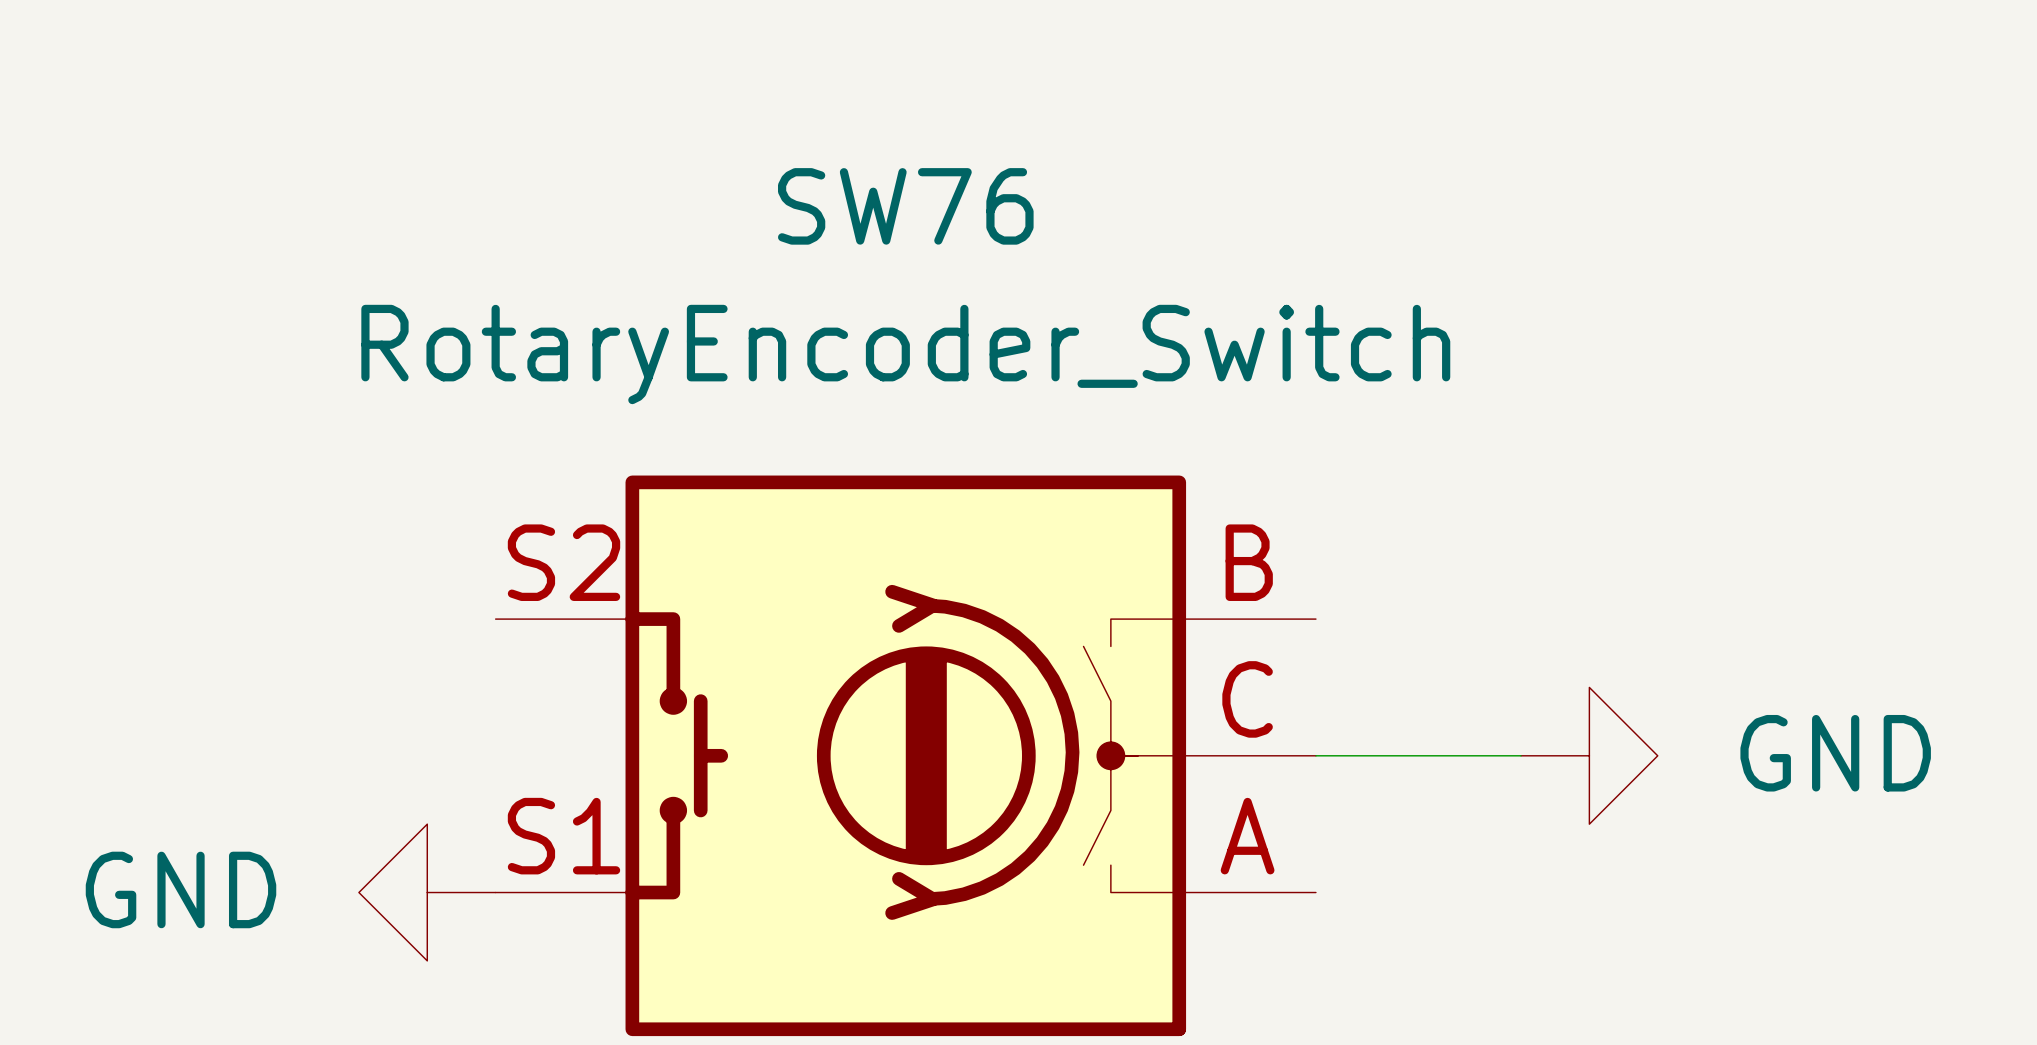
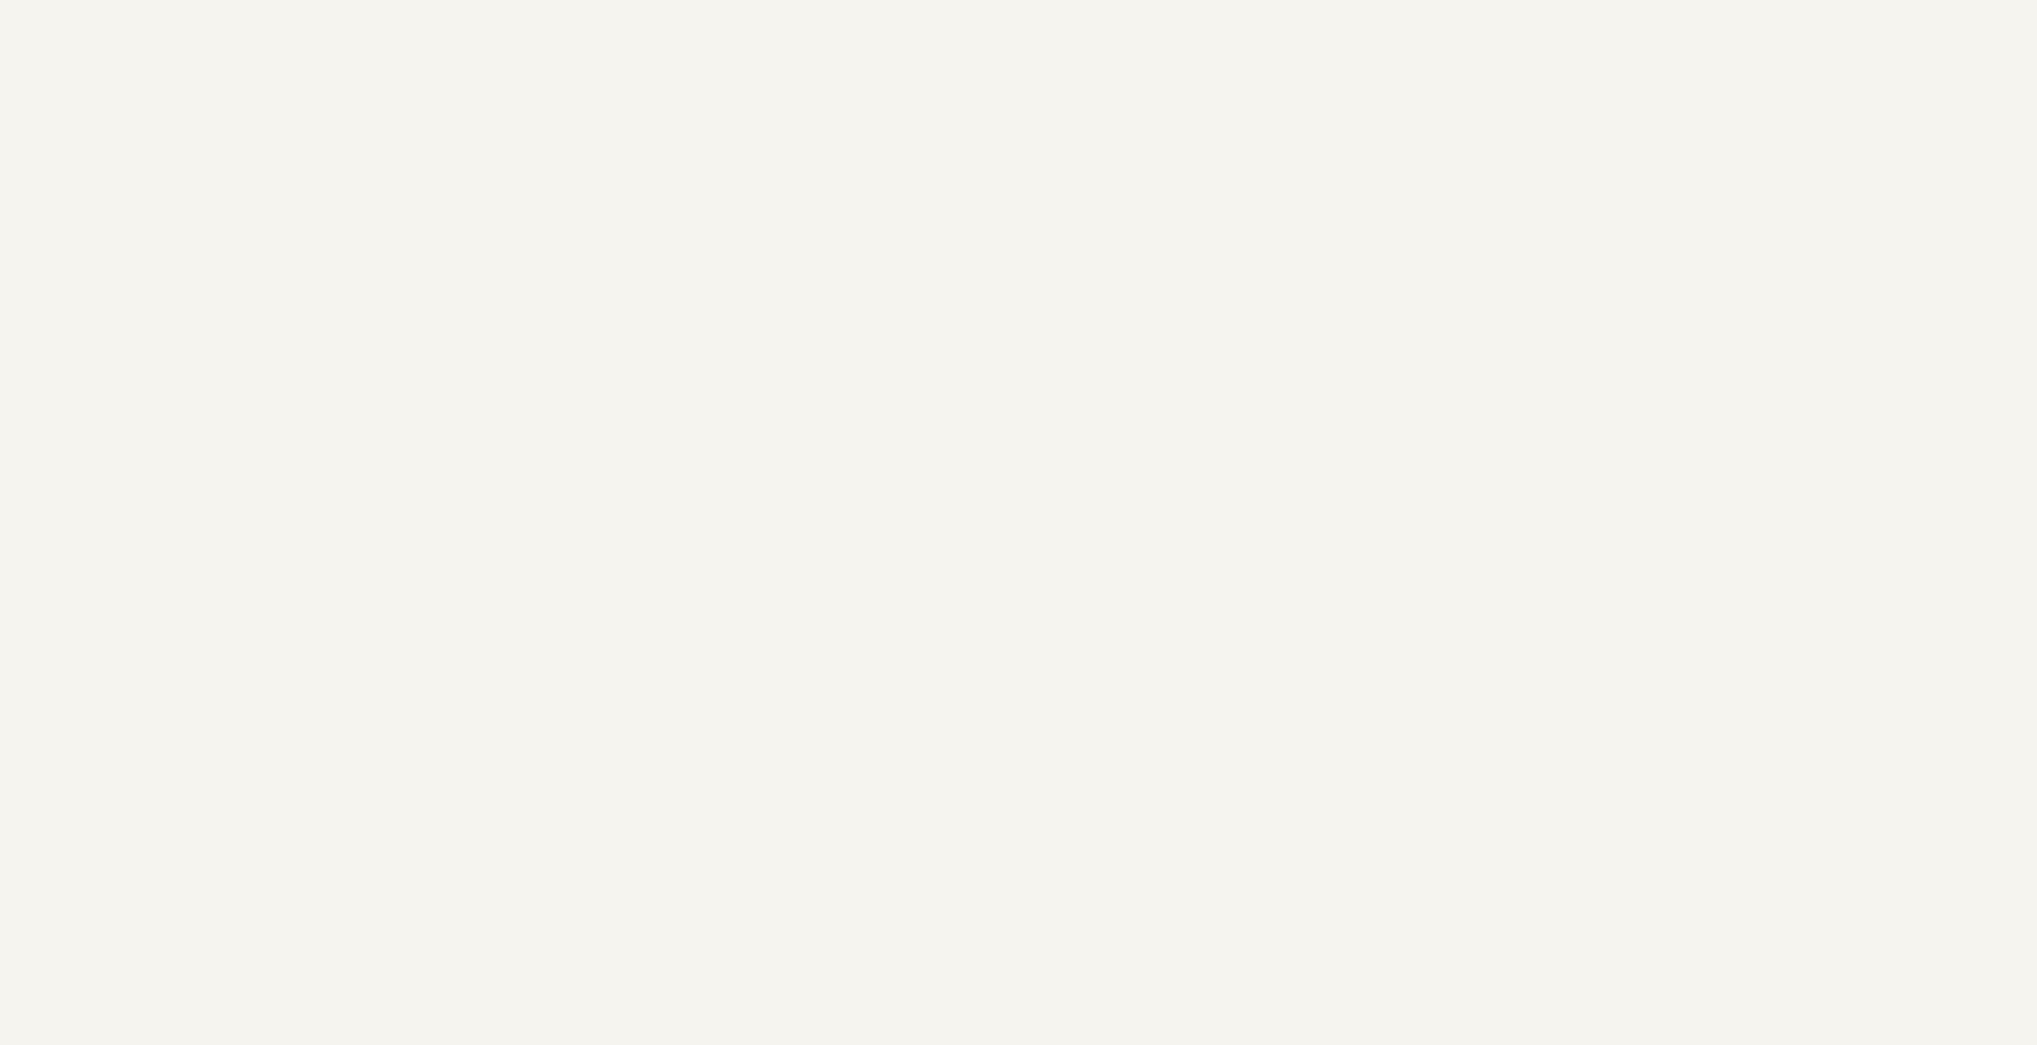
SW76: RotaryEncoder_Switch (905, 755) -> none
wire: (1315, 755) (1521, 755) -> none
power symbol: GND (1589, 755) -> none
power symbol: GND (427, 892) -> none

